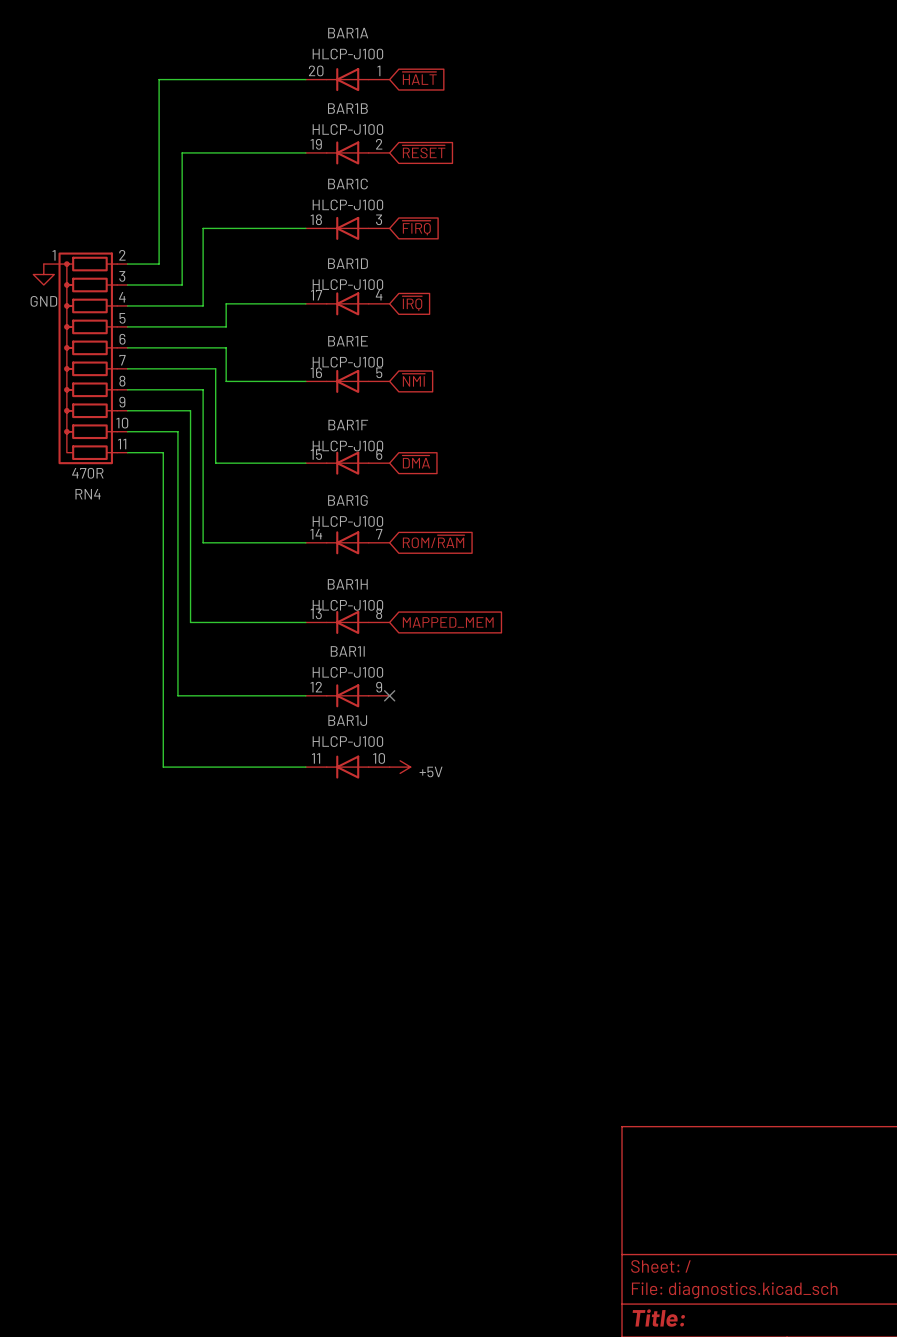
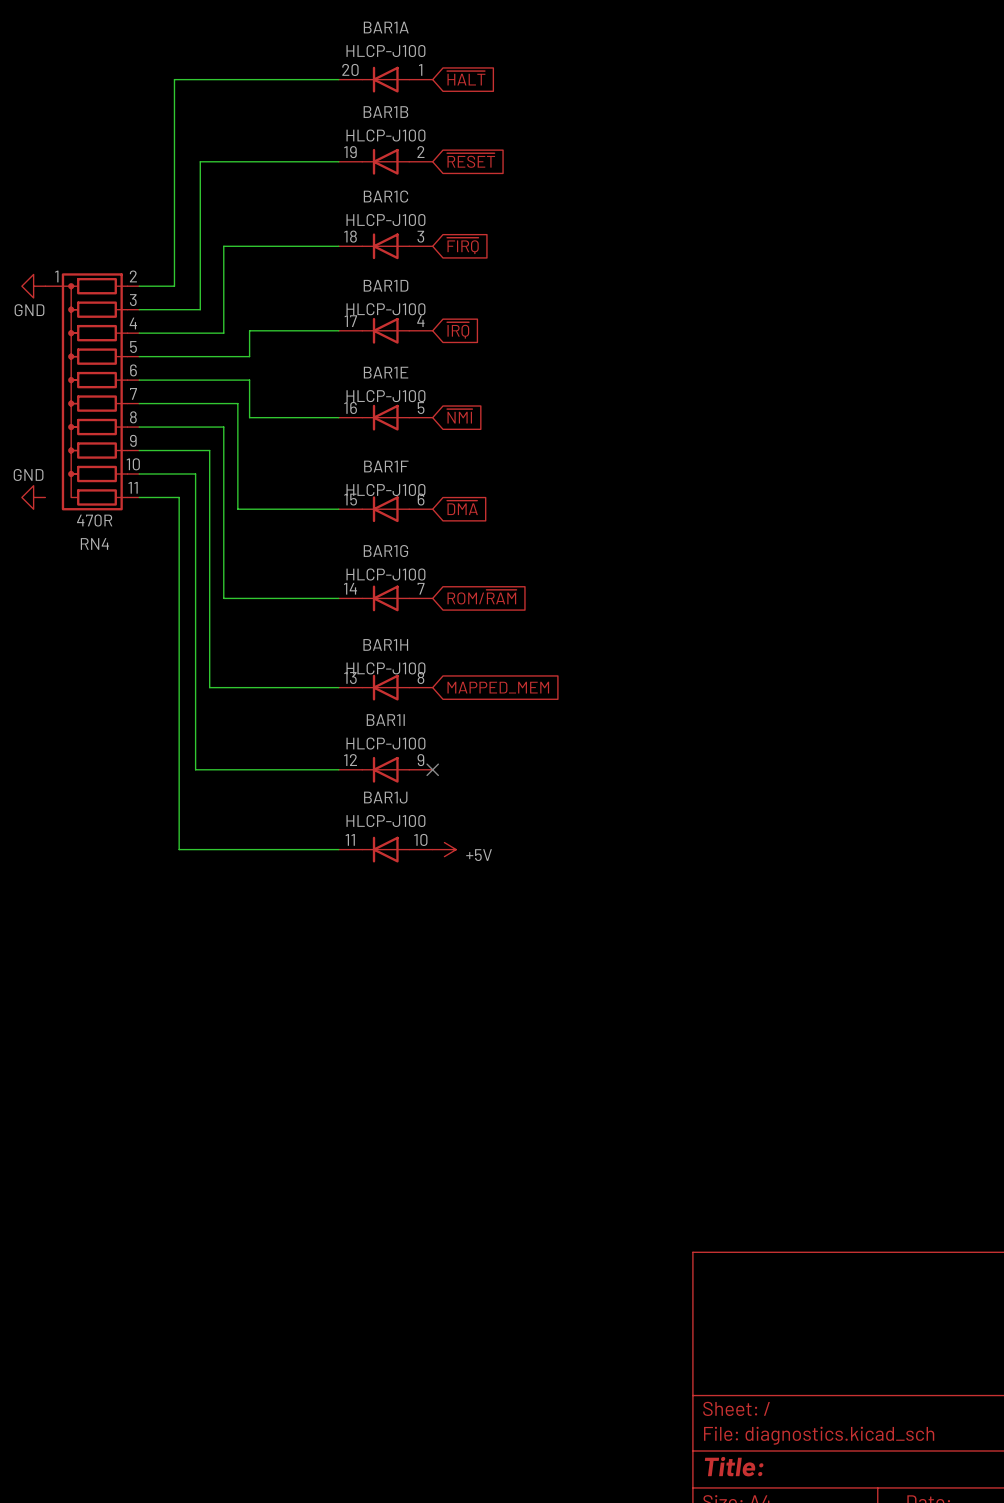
power symbol rotation: 0° (43, 274) -> 90° clockwise (33, 286)
power symbol position: GND (43, 274) -> GND (33, 286)
power symbol: none -> GND (33, 497)

